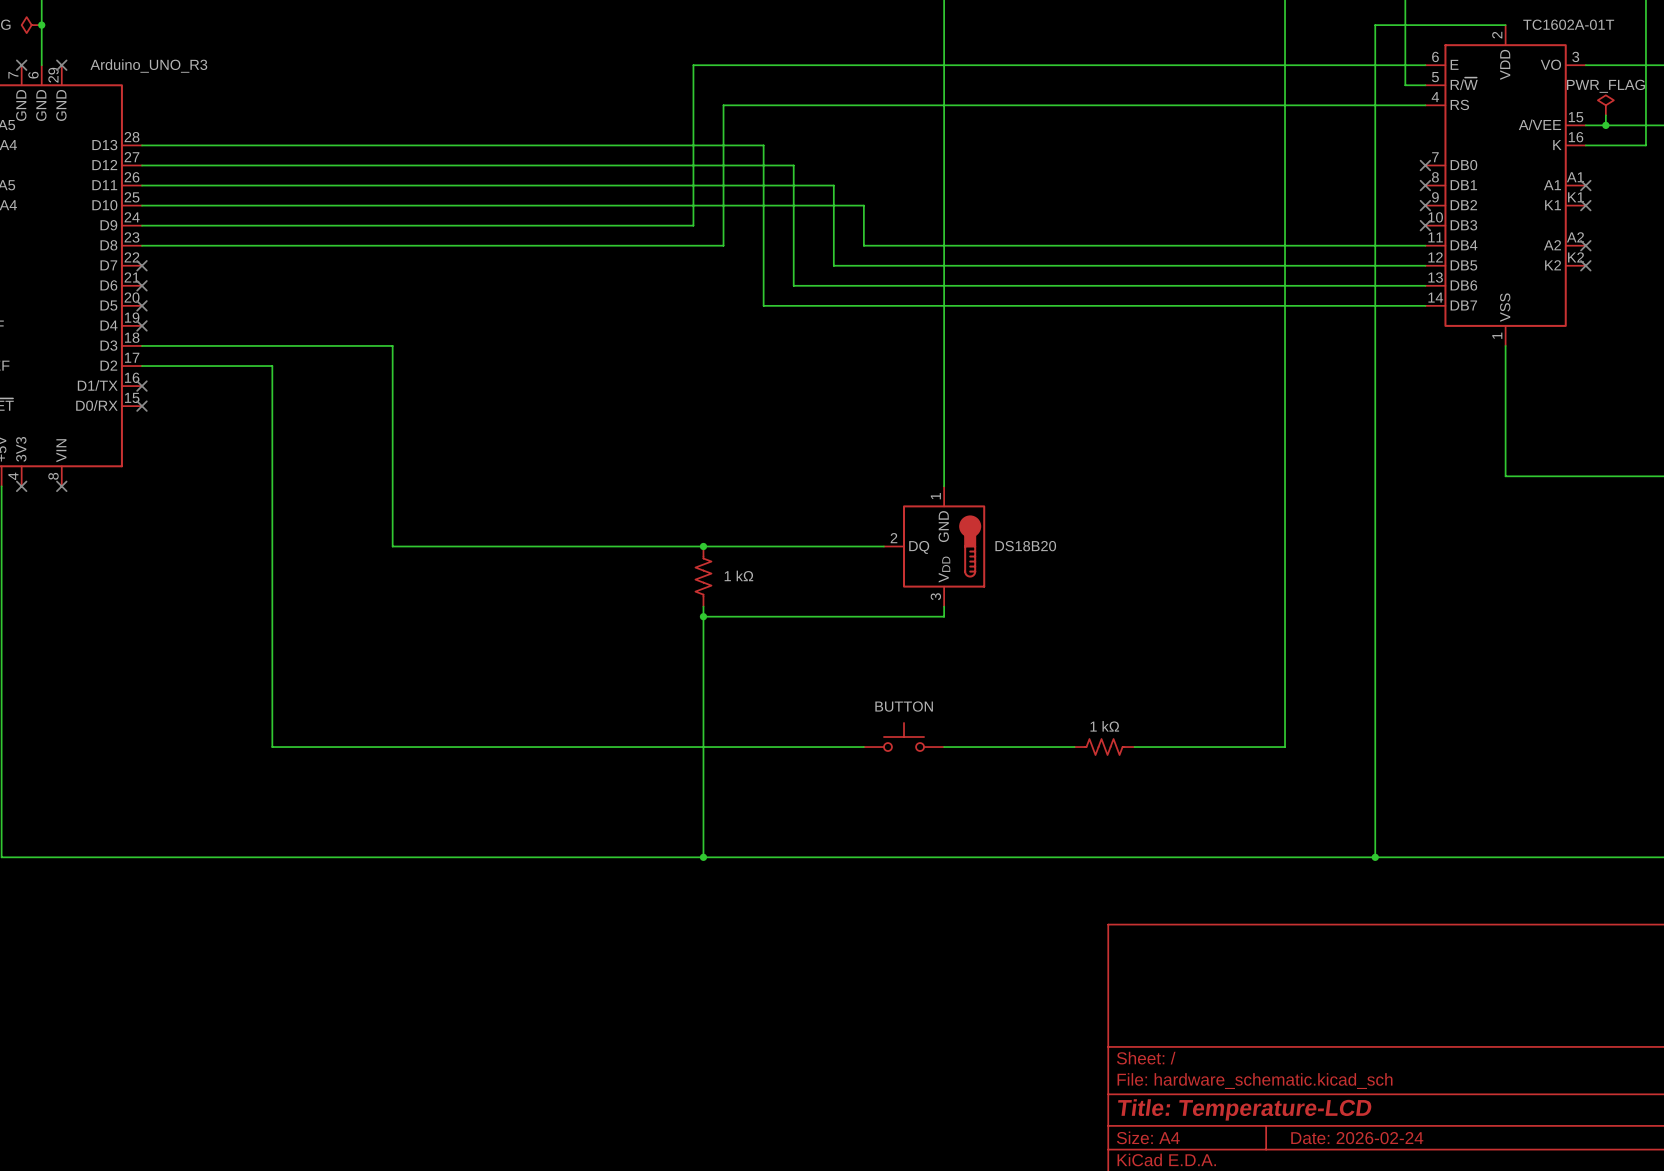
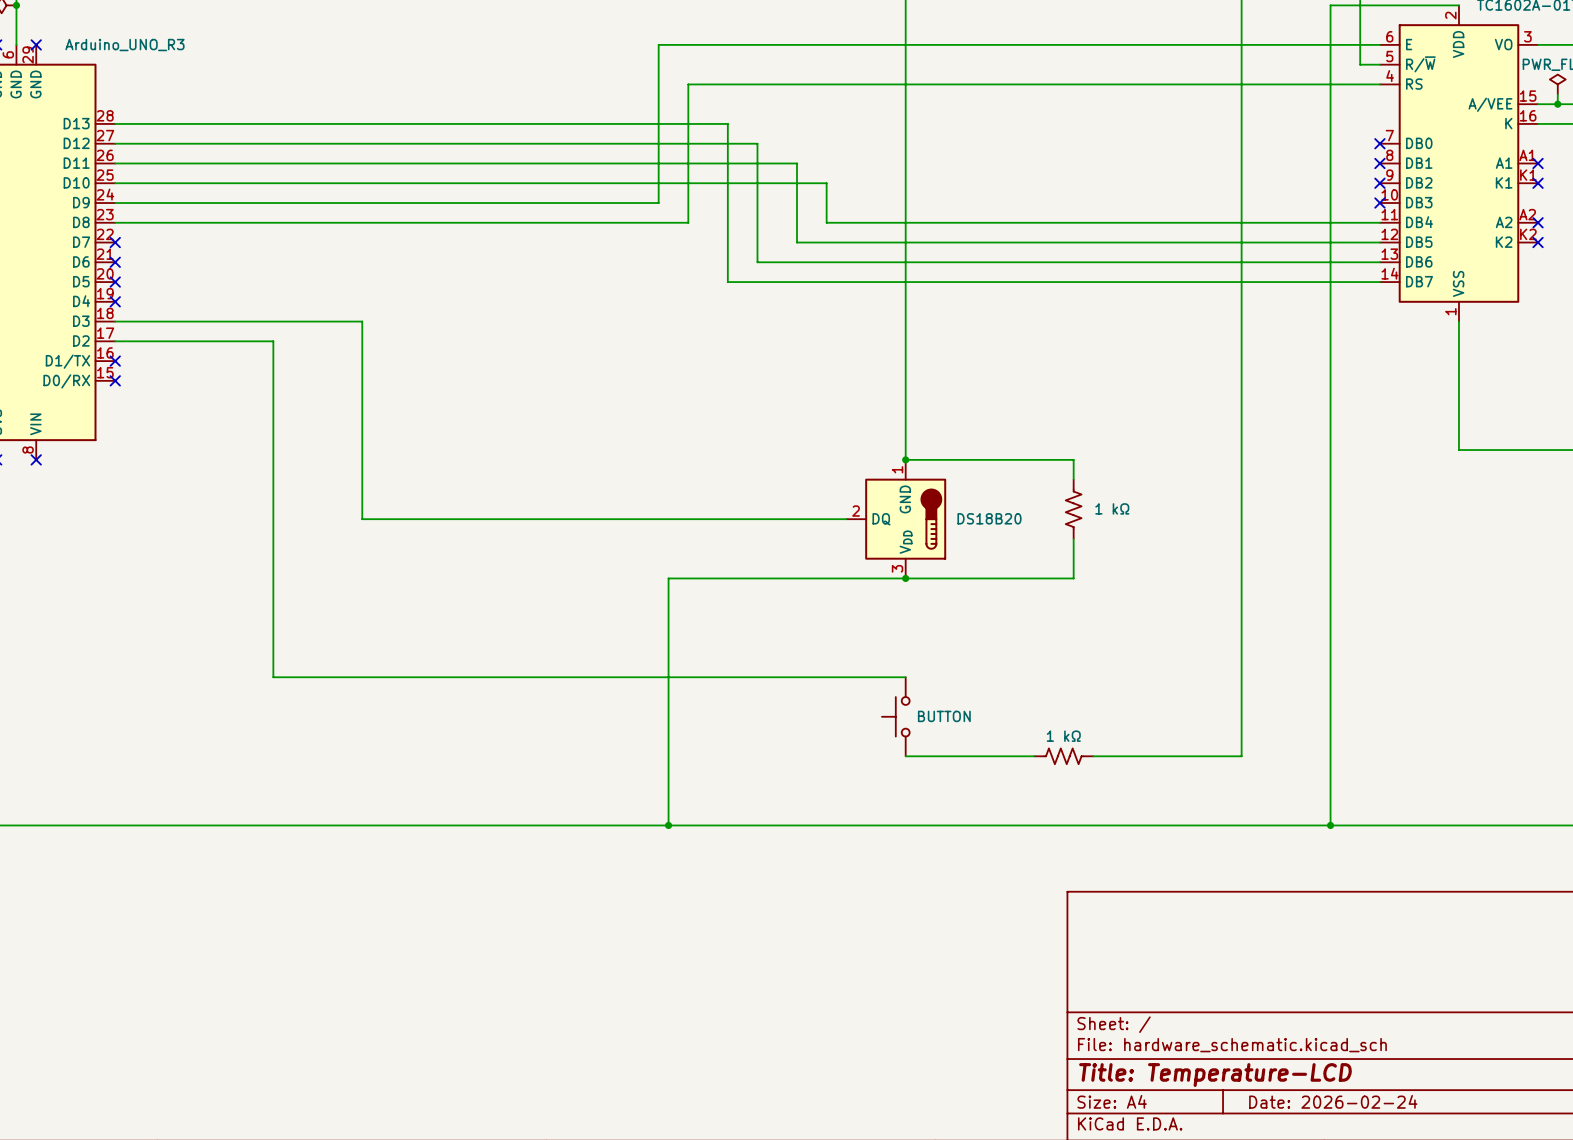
wire: (272, 366) (272, 747) (863, 747) -> (243, 341) (273, 341) (273, 677) (905, 677)
wire: none -> (905, 459) (1073, 459) (1073, 479)
junction: none -> (905, 459)
part: none -> 1 kΩ (1073, 509)
junction: (703, 546) -> none
wire: none -> (1073, 538) (1073, 578) (668, 578)
part: 1 kΩ (703, 576) -> none
wire: (944, 606) (944, 616) (703, 616) -> none
junction: none -> (905, 578)
junction: (703, 616) -> none
part value position: BUTTON (904, 706) -> BUTTON (944, 716)
part rotation: 0° (904, 737) -> 90° counterclockwise (895, 716)
wire: (944, 747) (1074, 747) -> (905, 756) (1034, 756)
part position: (1104, 747) -> (1063, 756)
wire: (1134, 747) (1285, 747) -> (1093, 756) (1241, 756) (1241, 716)

